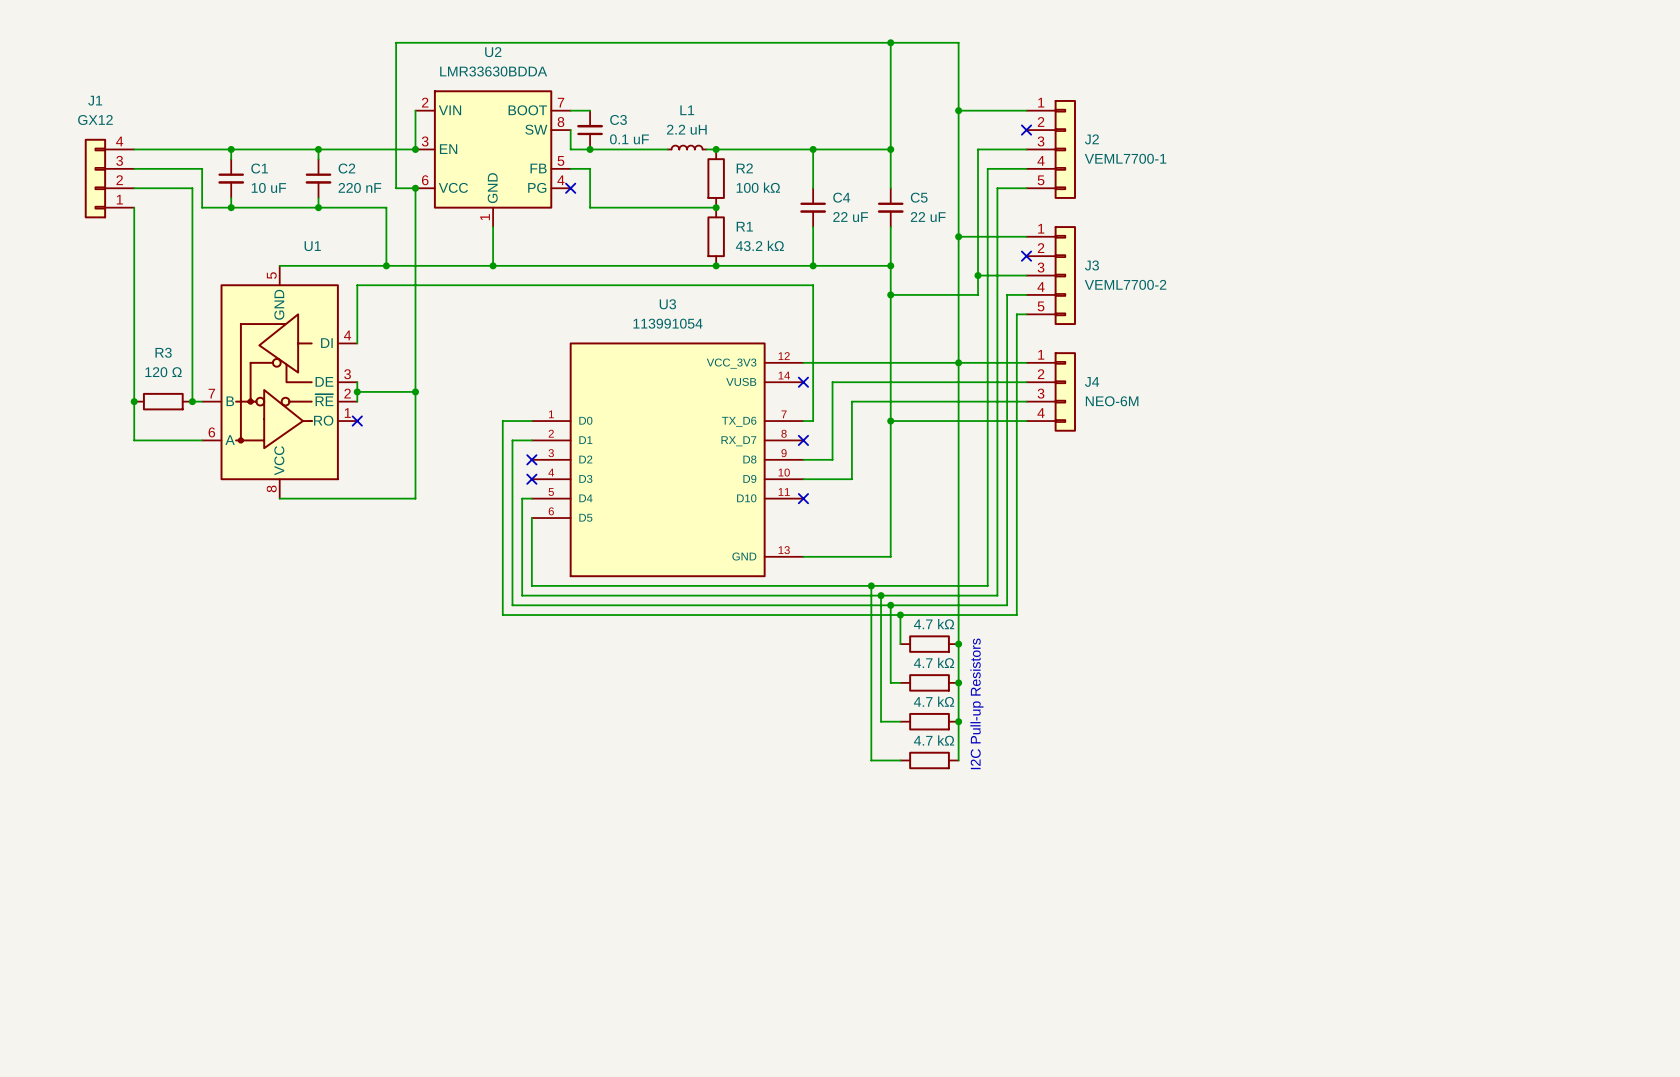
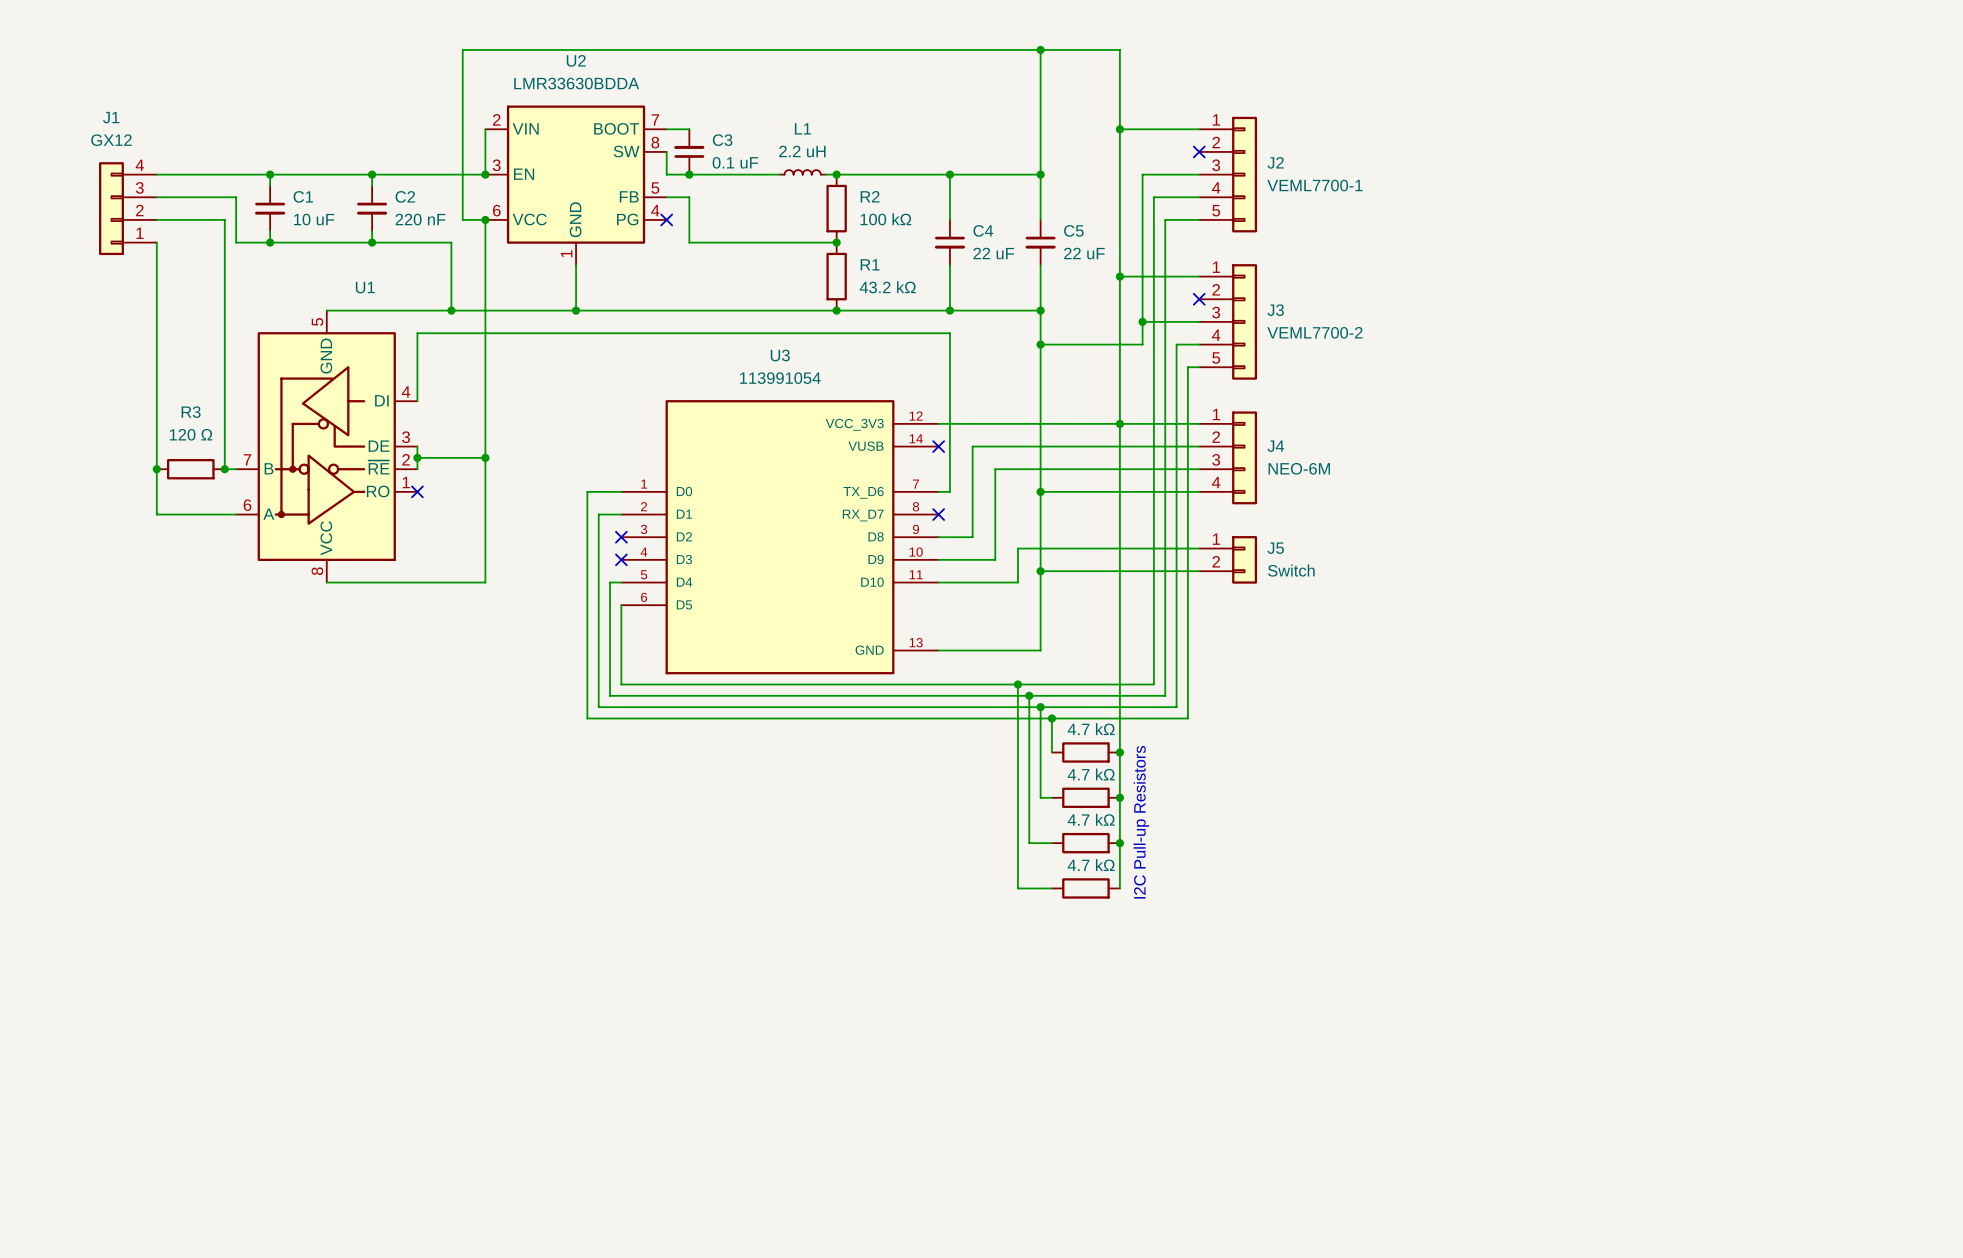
wire: none -> (1199, 548) (1017, 548) (1017, 582) (938, 582)
J5: none -> Switch (1228, 559)
wire: none -> (1040, 571) (1199, 571)
junction: none -> (1040, 571)
no-connect mark: (803, 498) -> none

